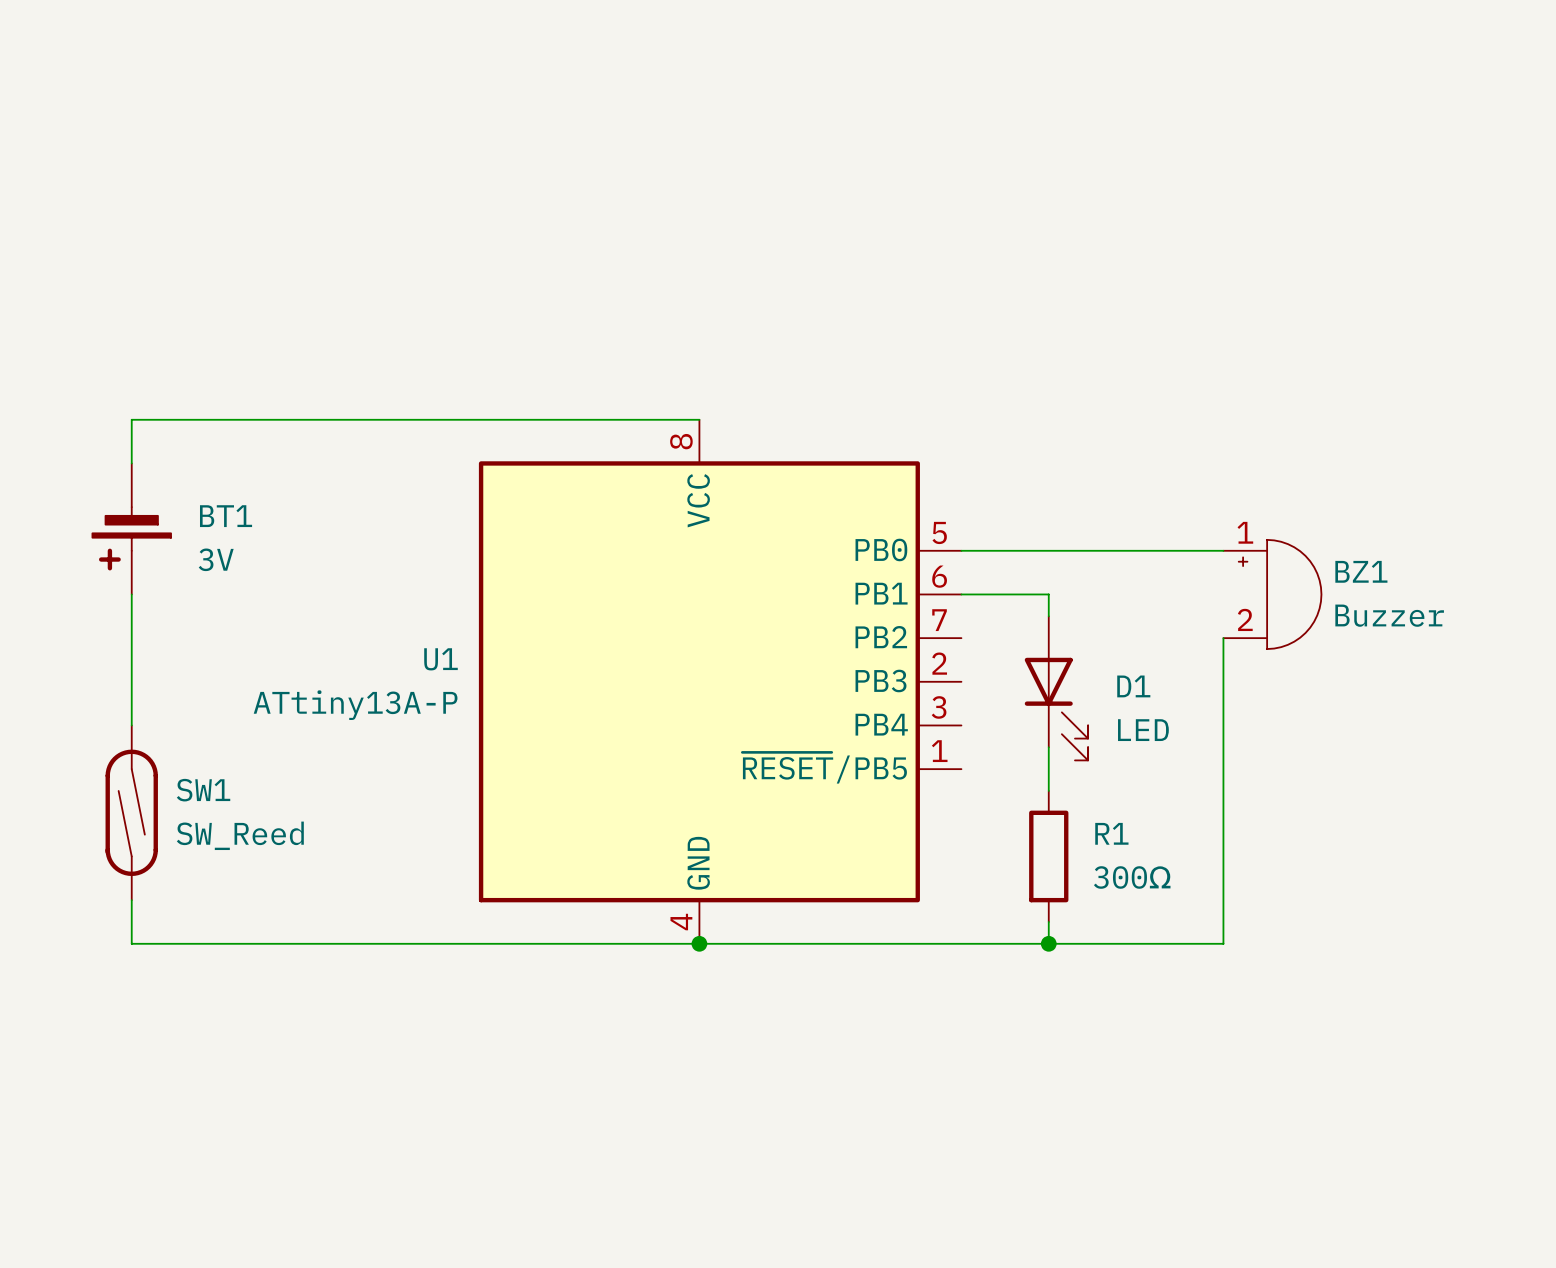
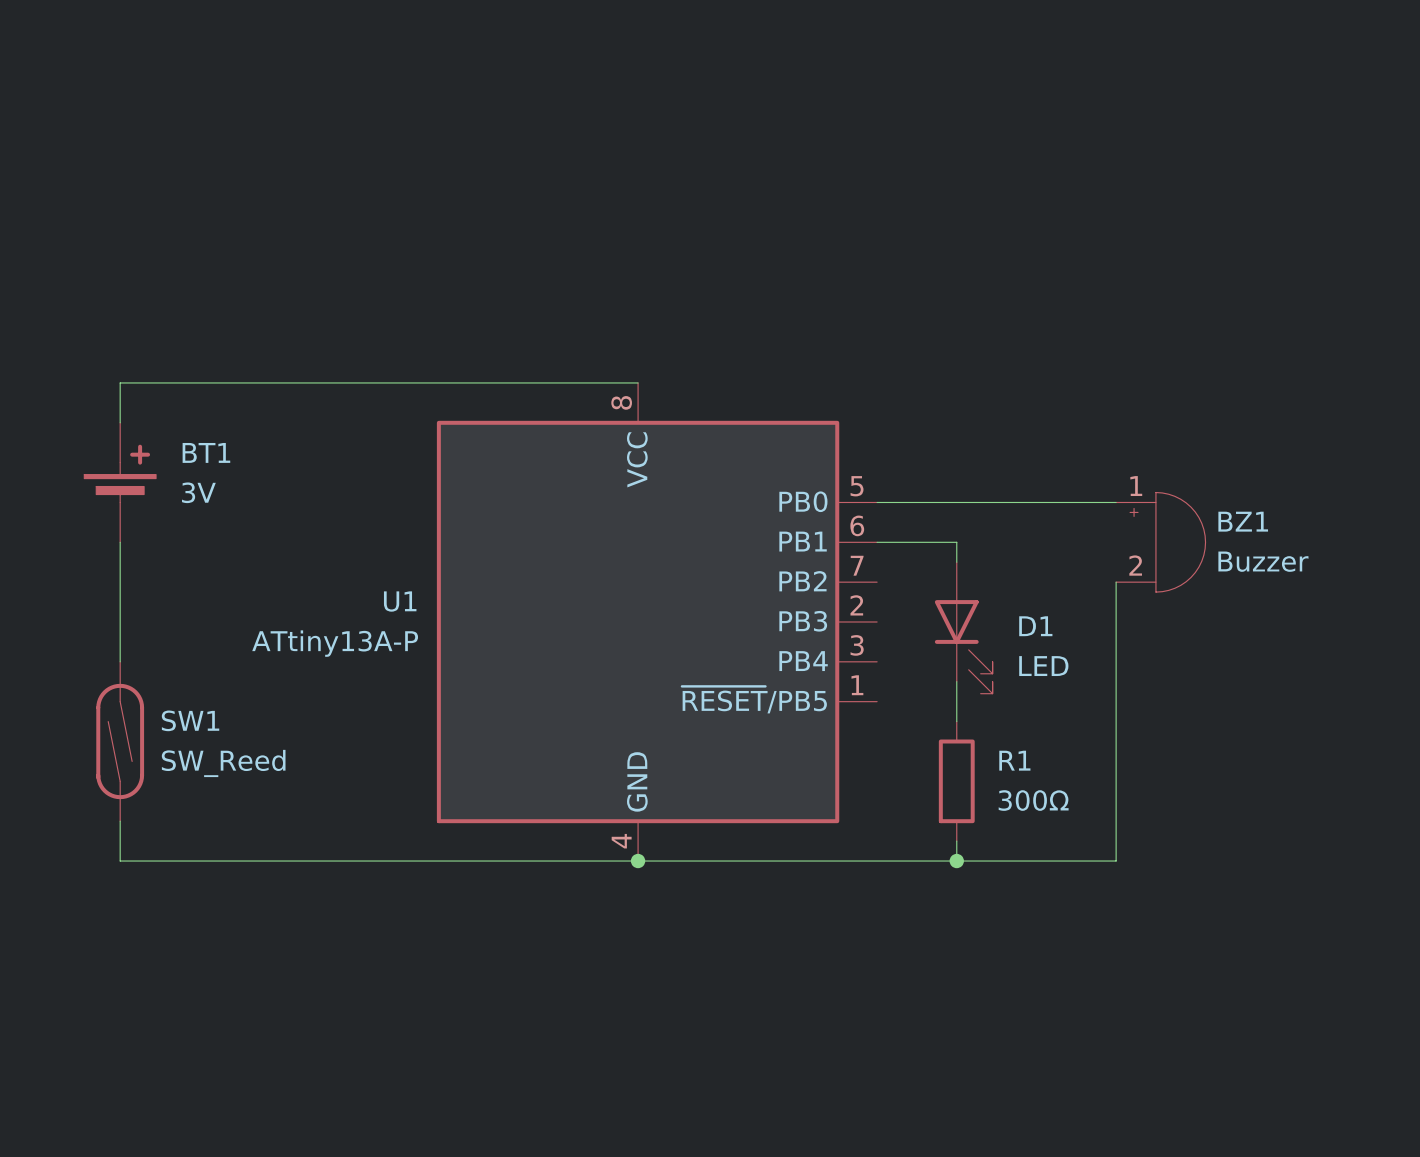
BT1 rotation: 0° (131, 538) -> 180° (120, 473)

